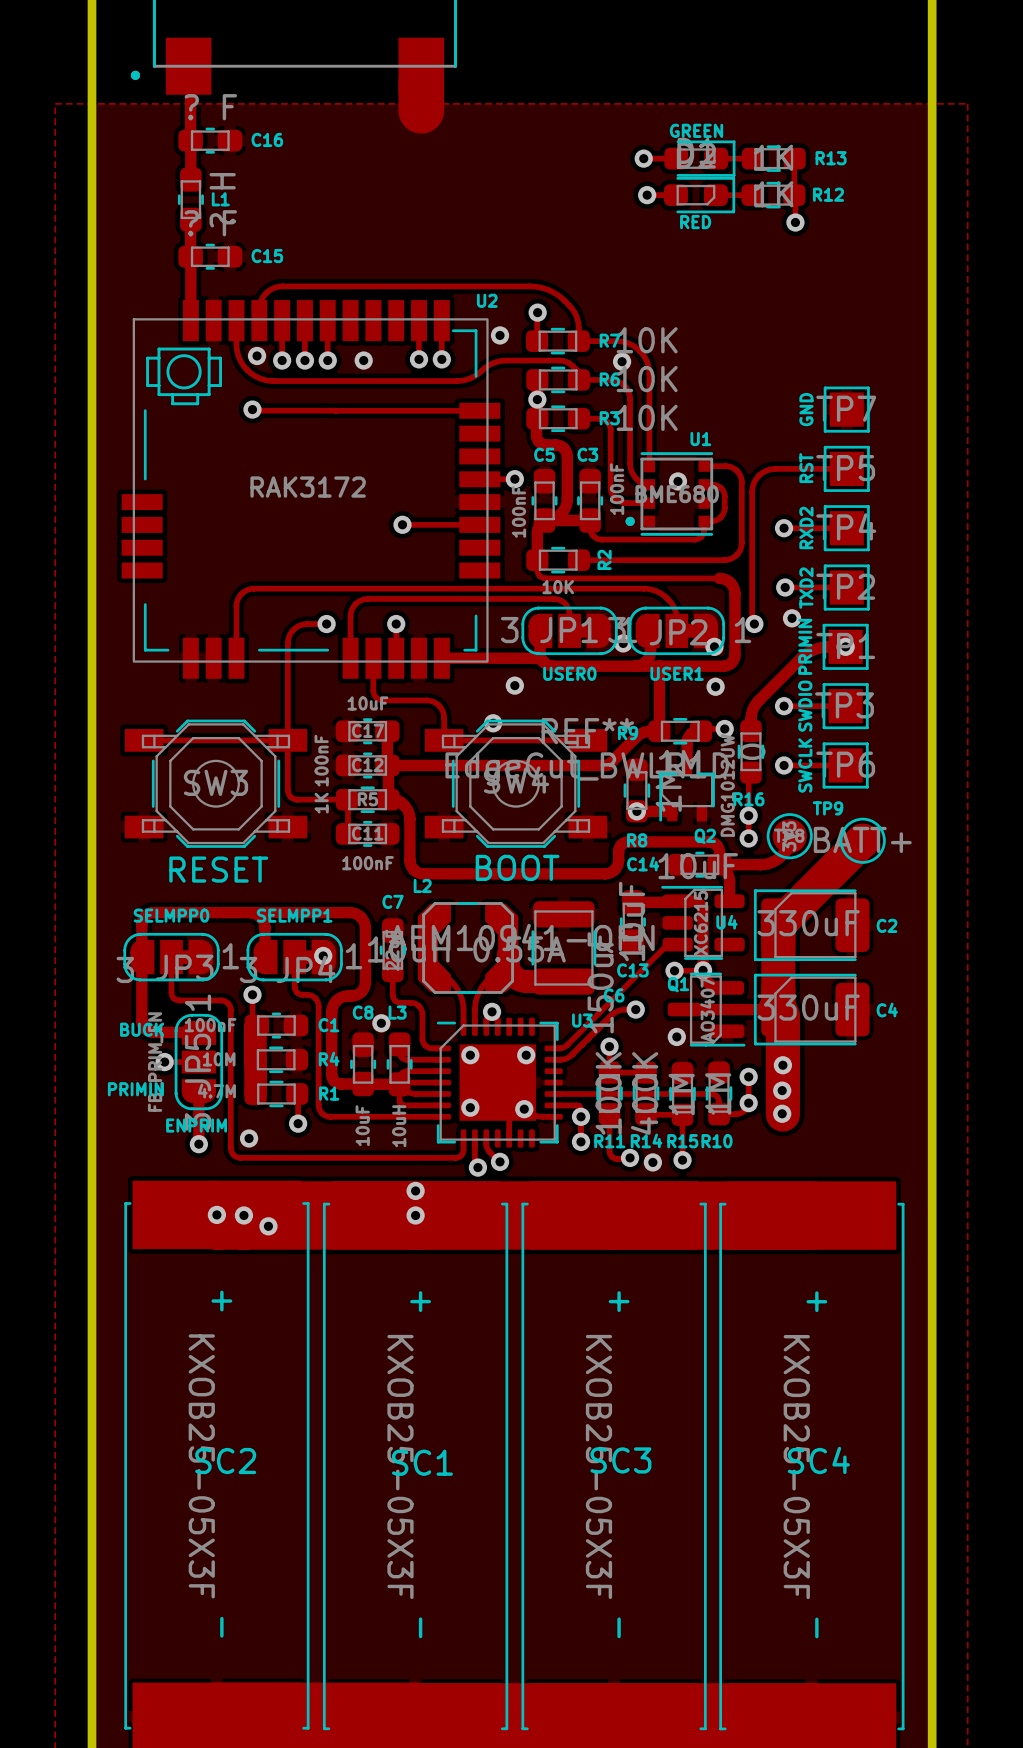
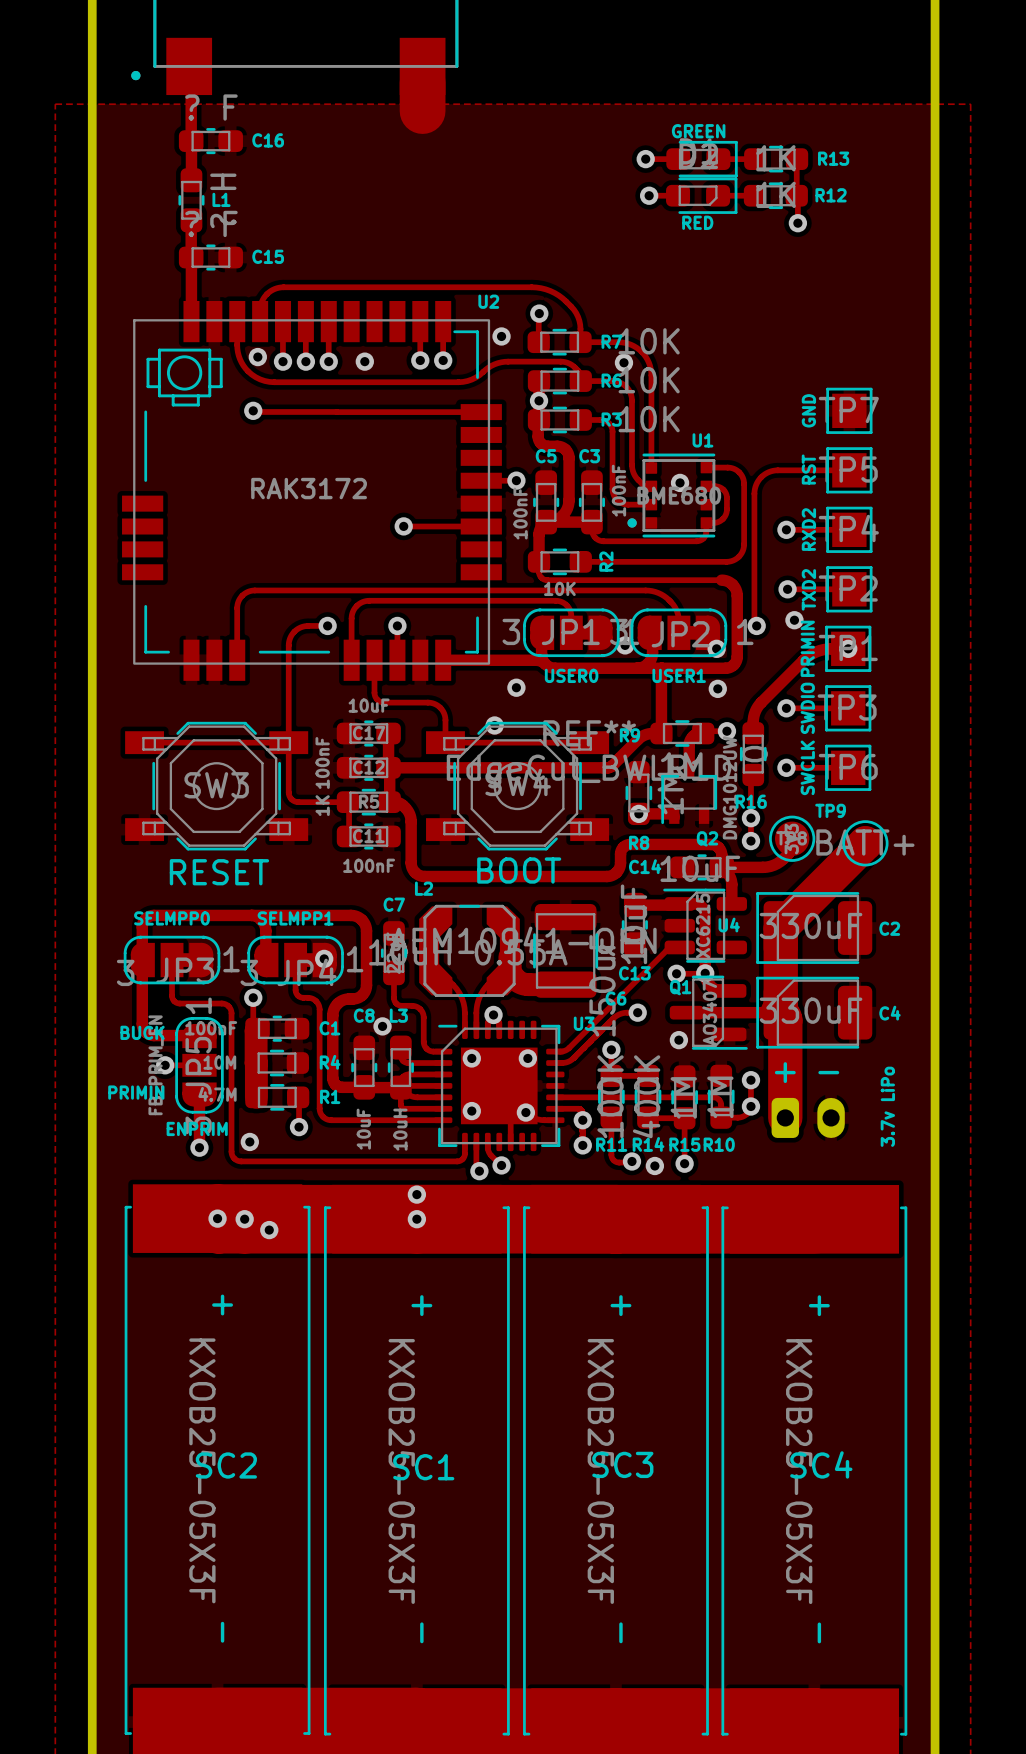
via: (782, 1065) -> none
text: none -> + (785, 1072)
text: none -> - (828, 1072)
via: (782, 1090) -> none
text: none -> 3.7v LiPo (887, 1106)
via: (782, 1113) -> none
part: none -> (808, 1117)

